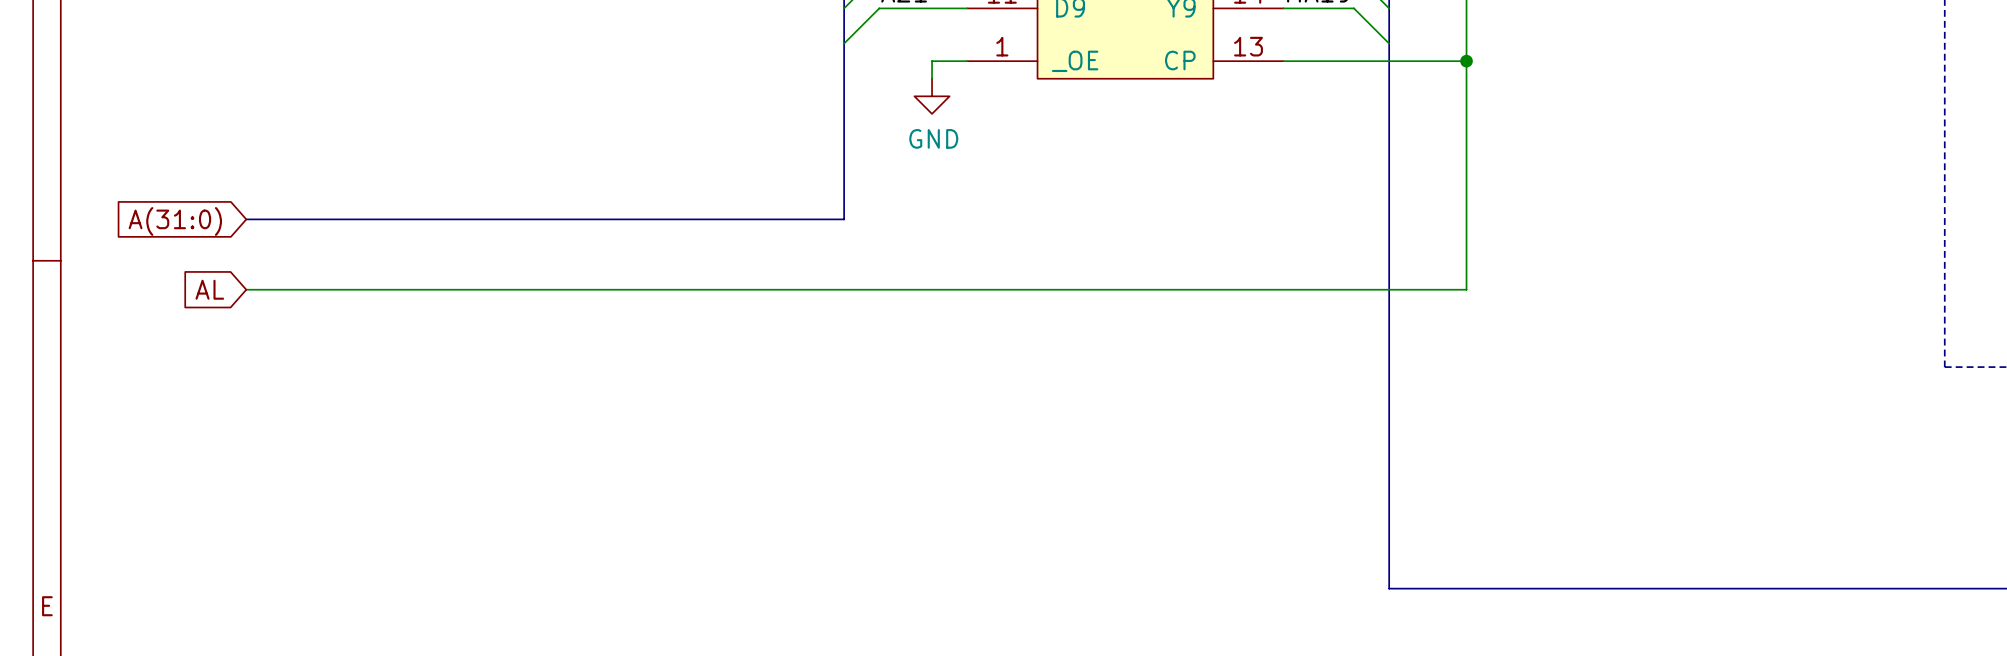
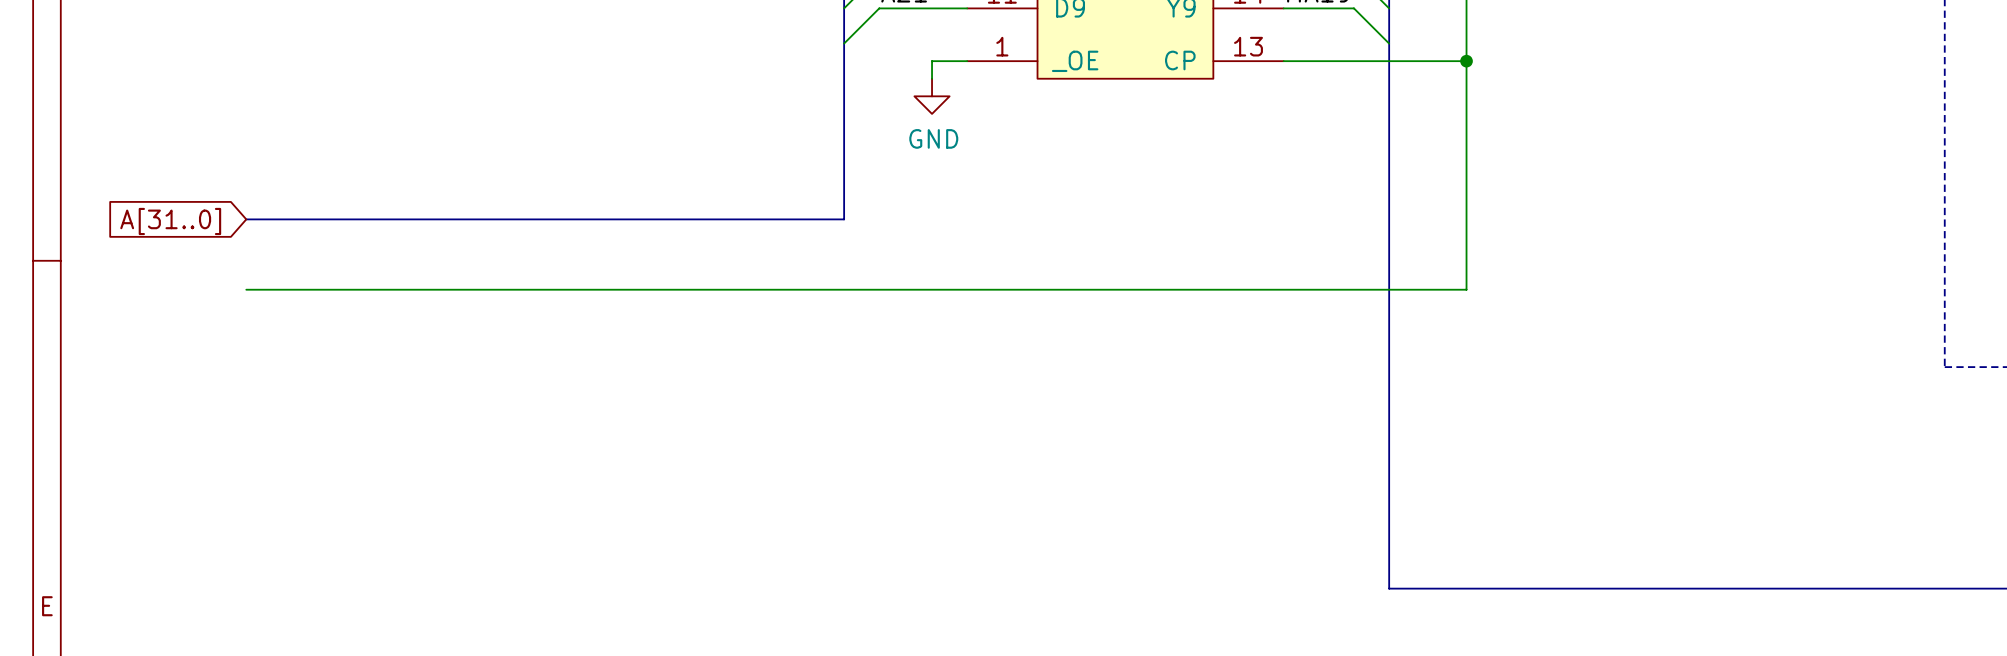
global label: A(31:0) (175, 221) -> A[31..0] (170, 221)
global label: AL (209, 289) -> none

